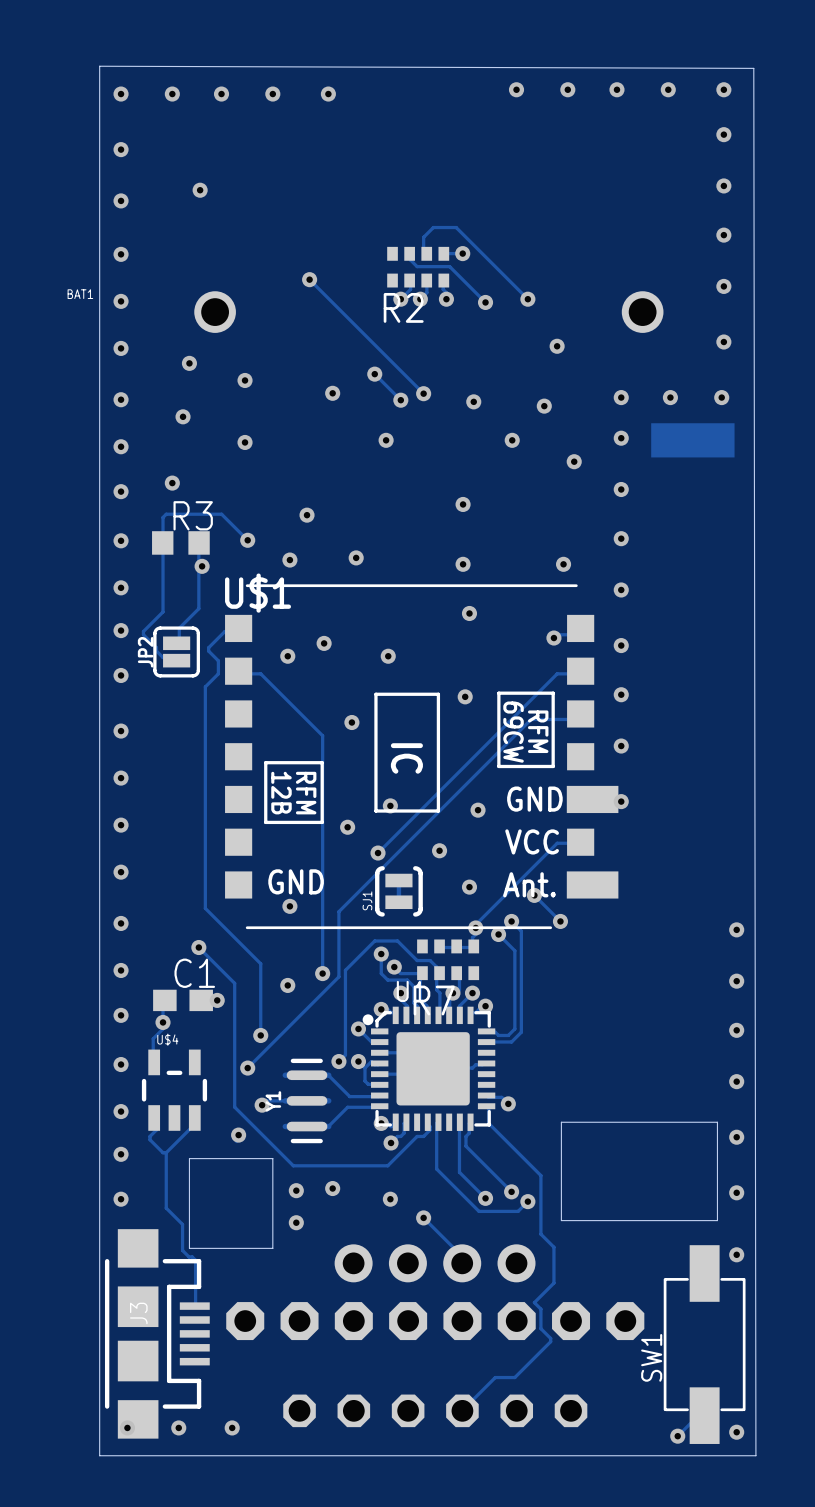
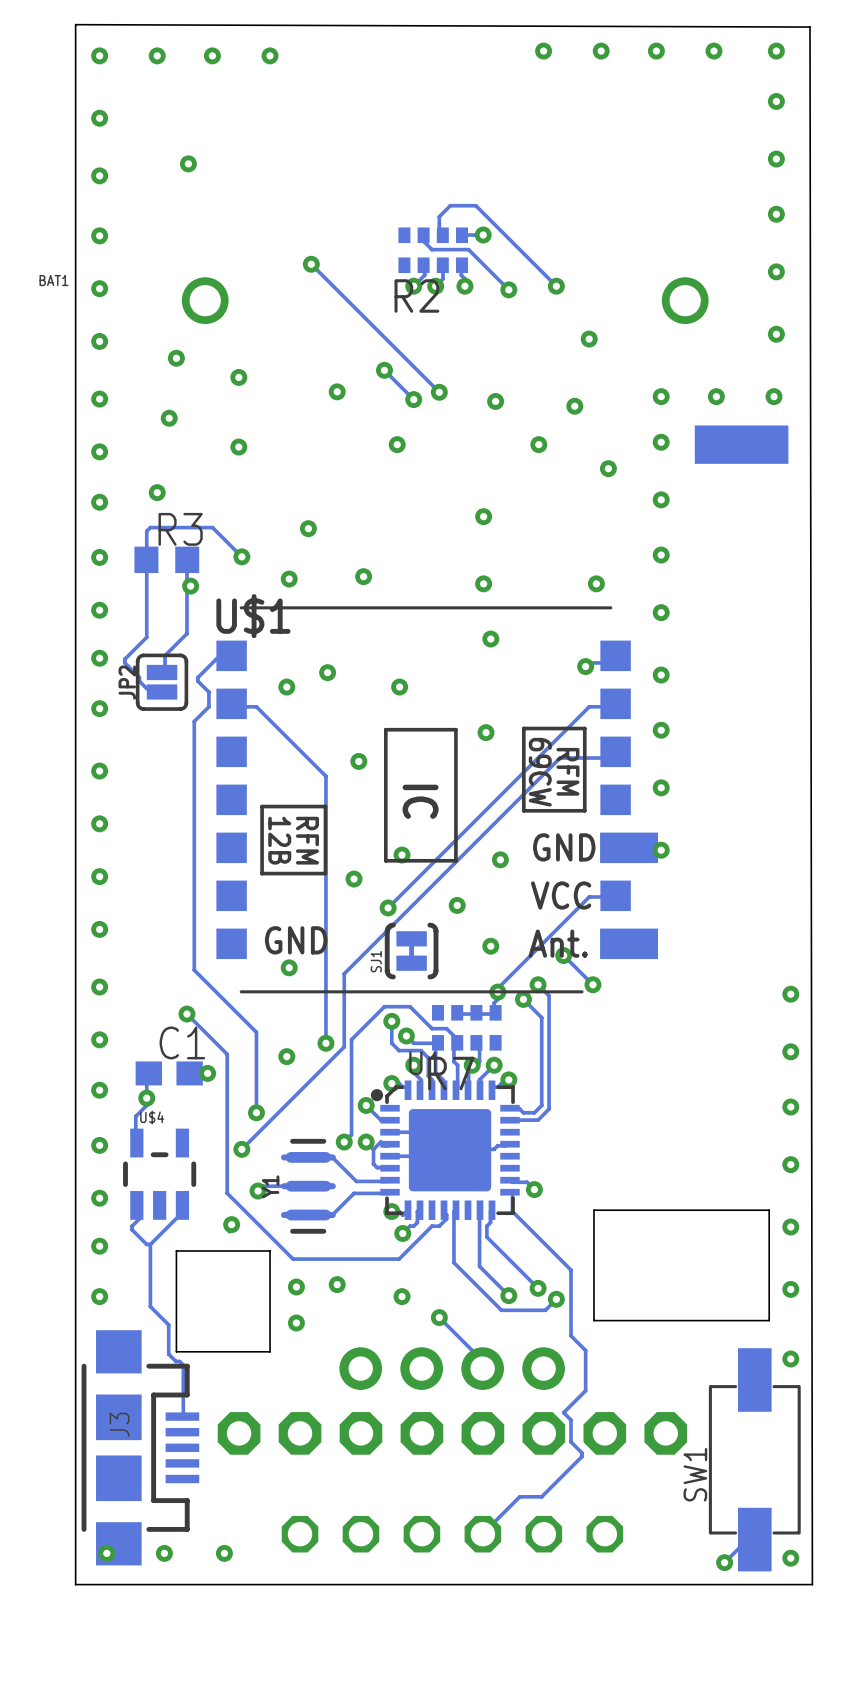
via: (328, 94) -> none

